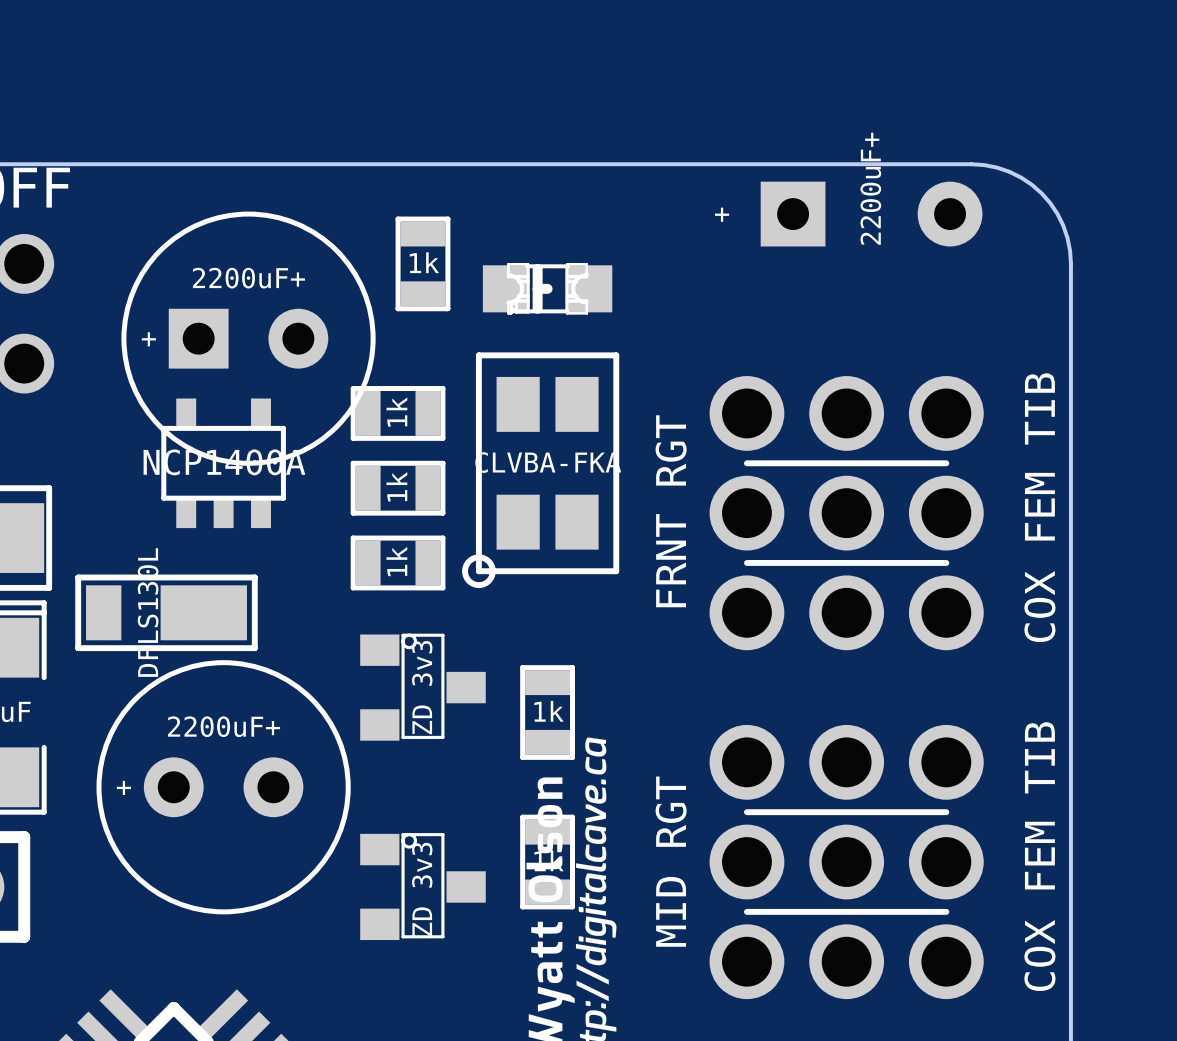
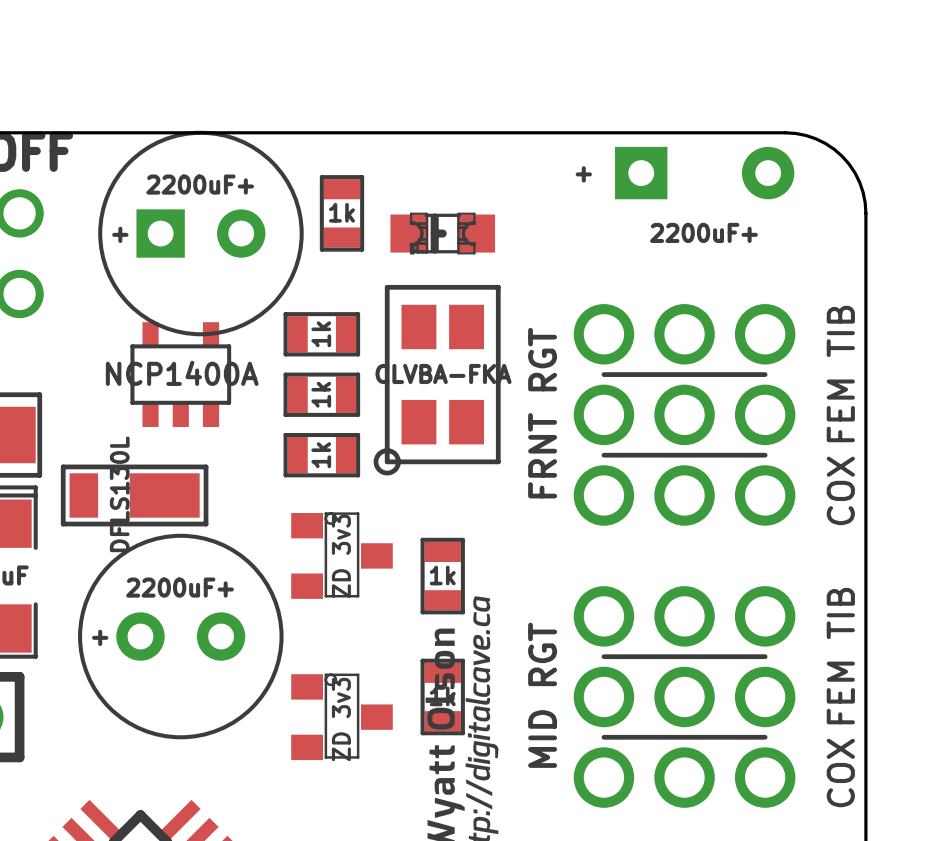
part value rotation: 0° (870, 188) -> 90° clockwise (703, 232)
part position: (248, 338) -> (200, 233)

